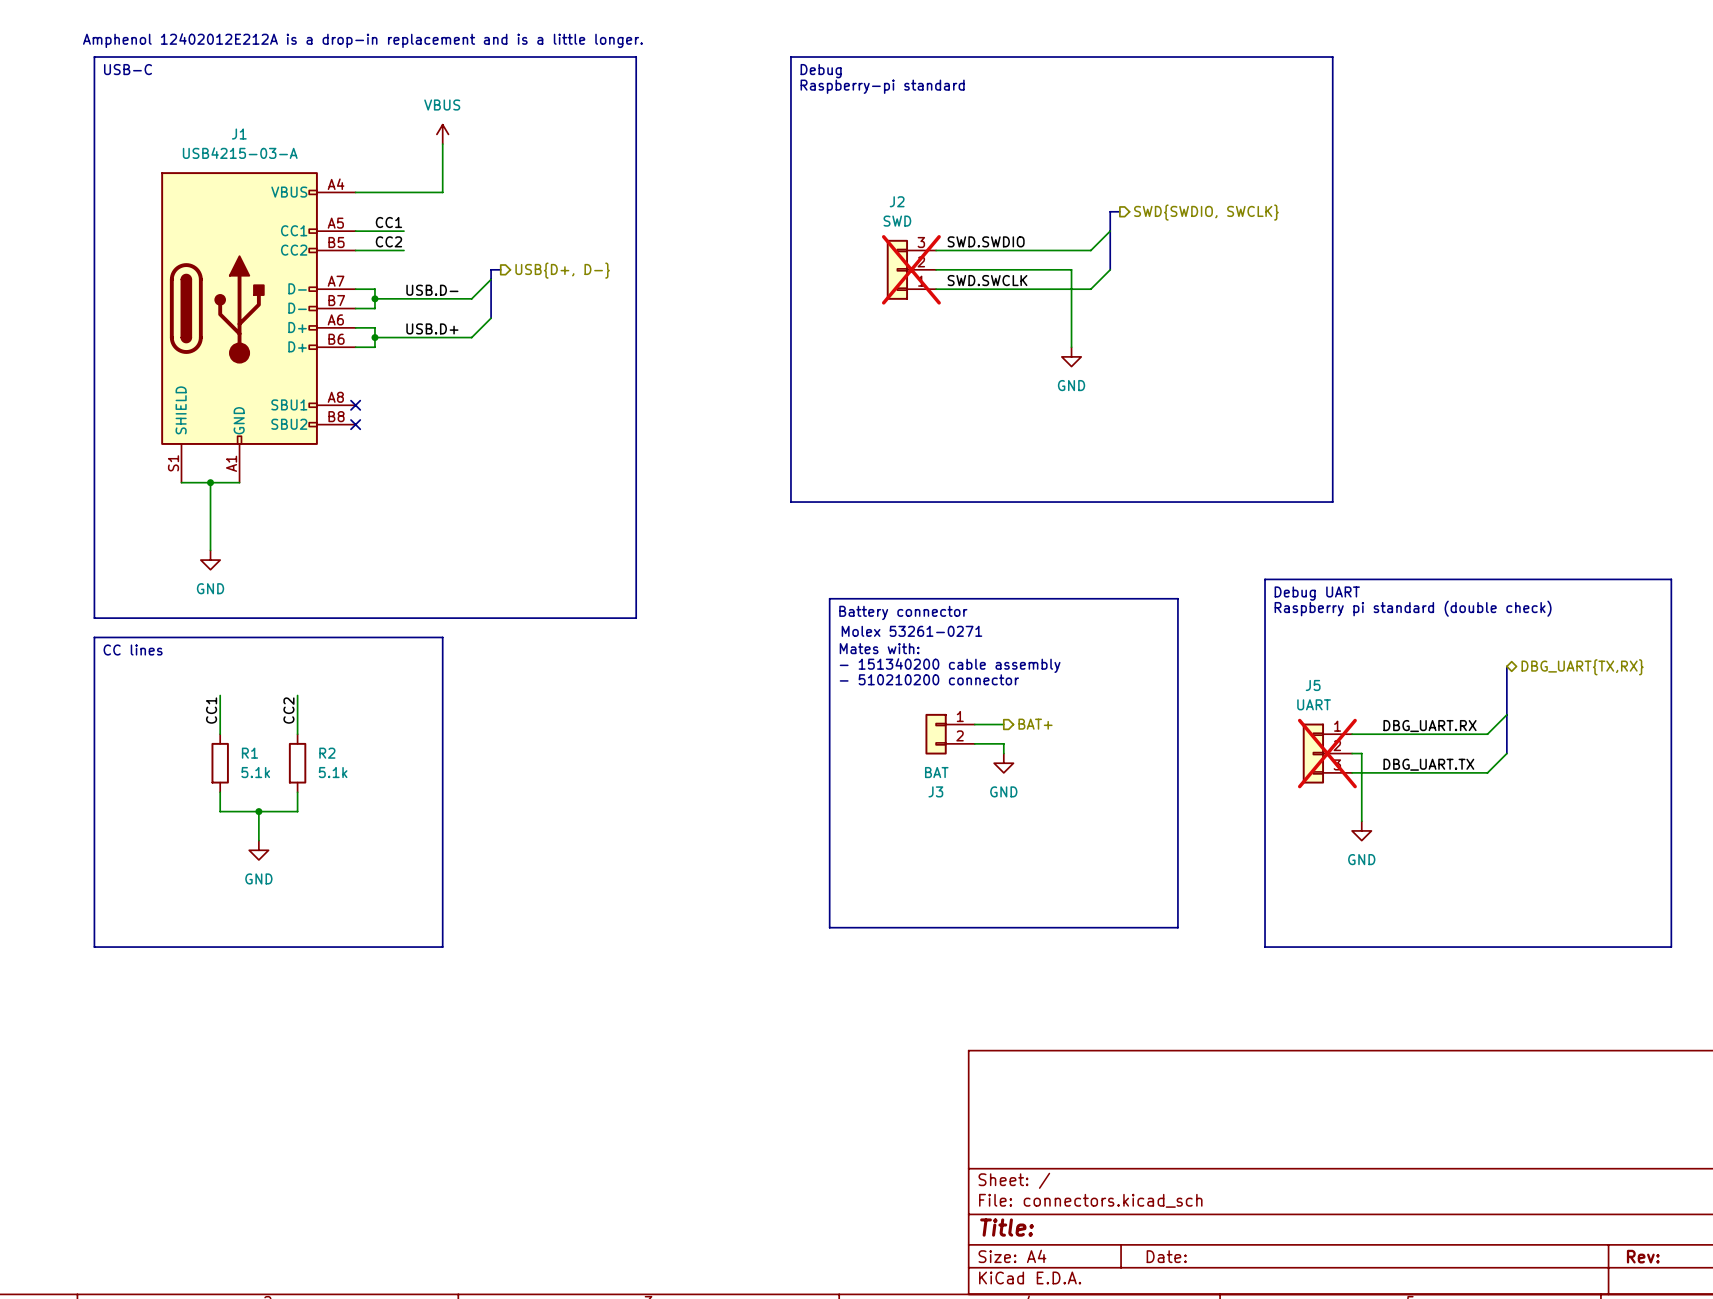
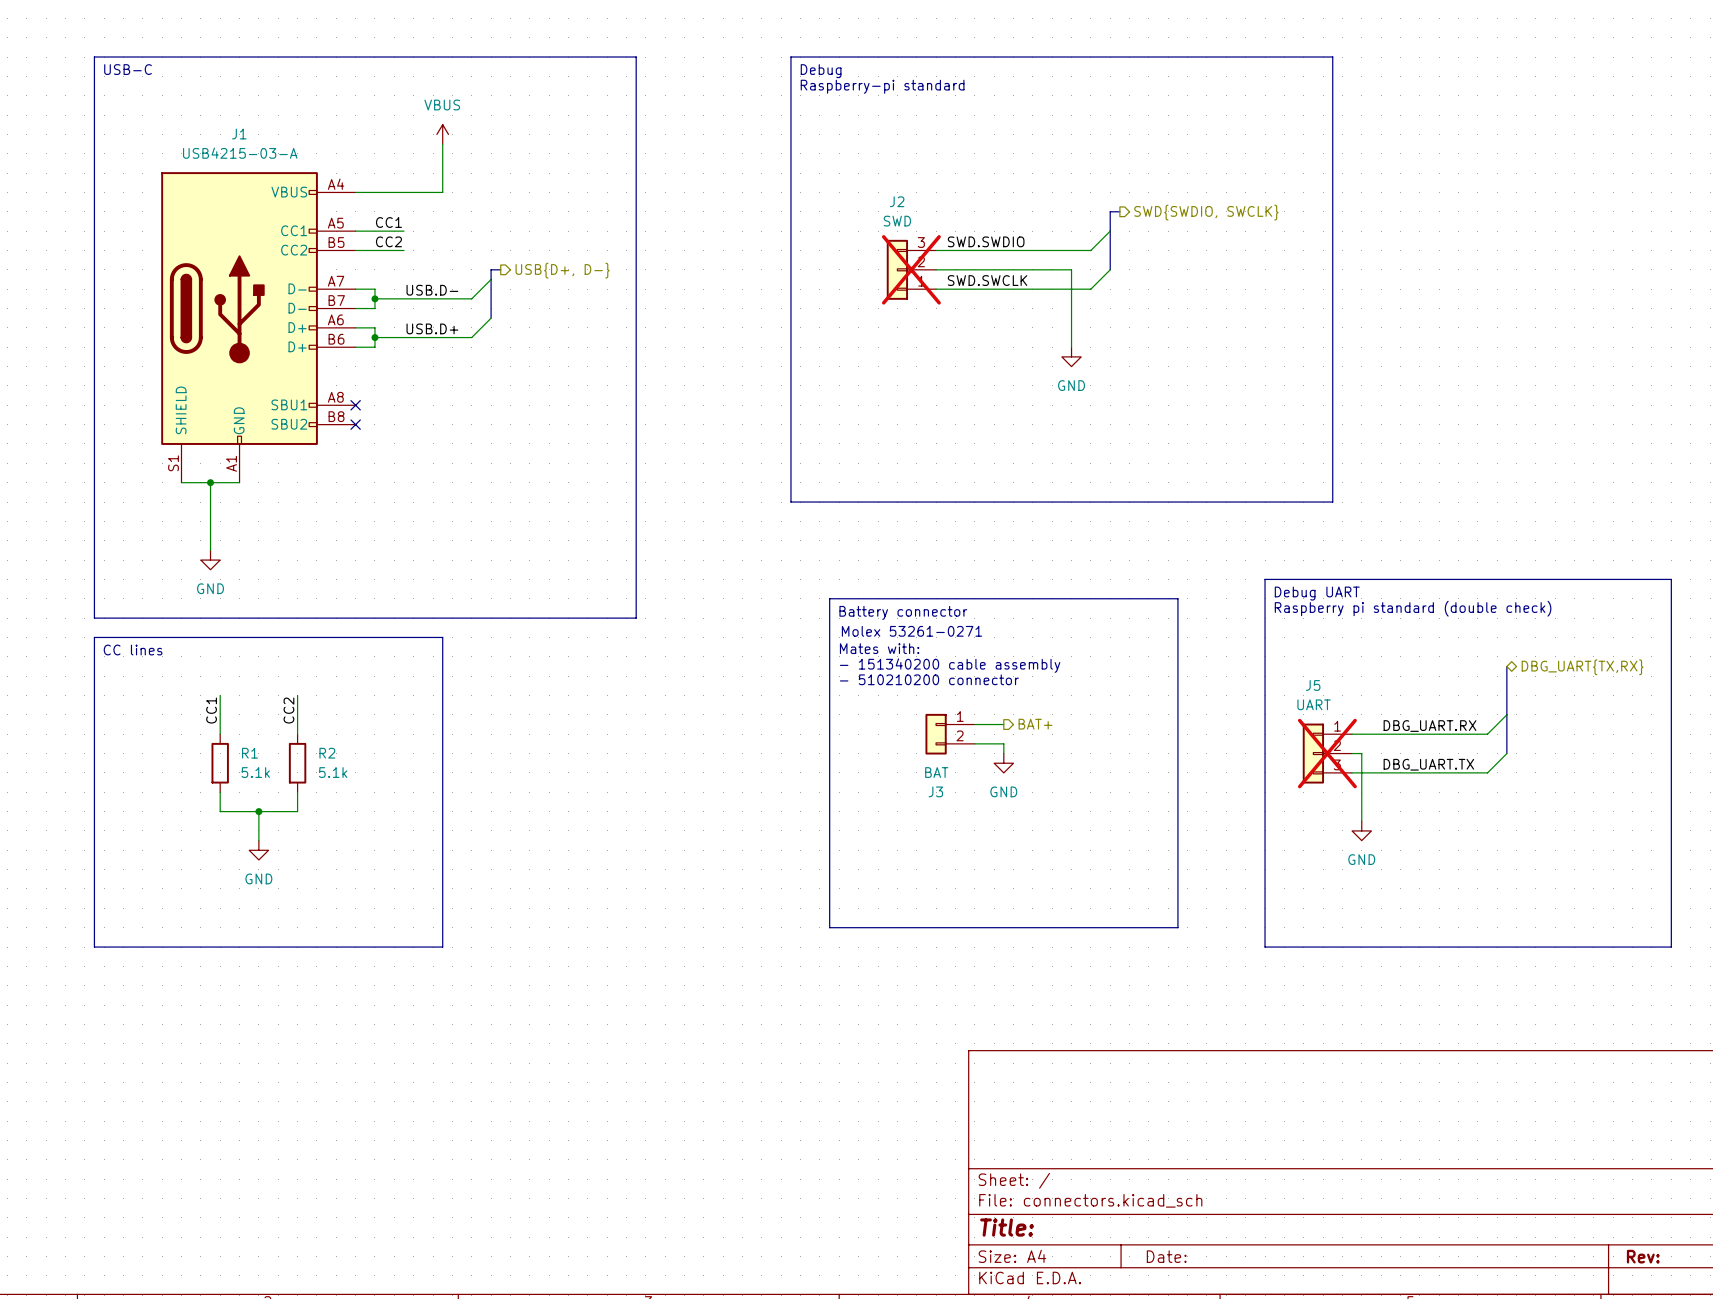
text: Amphenol 12402012E212A is a drop-in replacement and is a little longer. (362, 40) -> none

